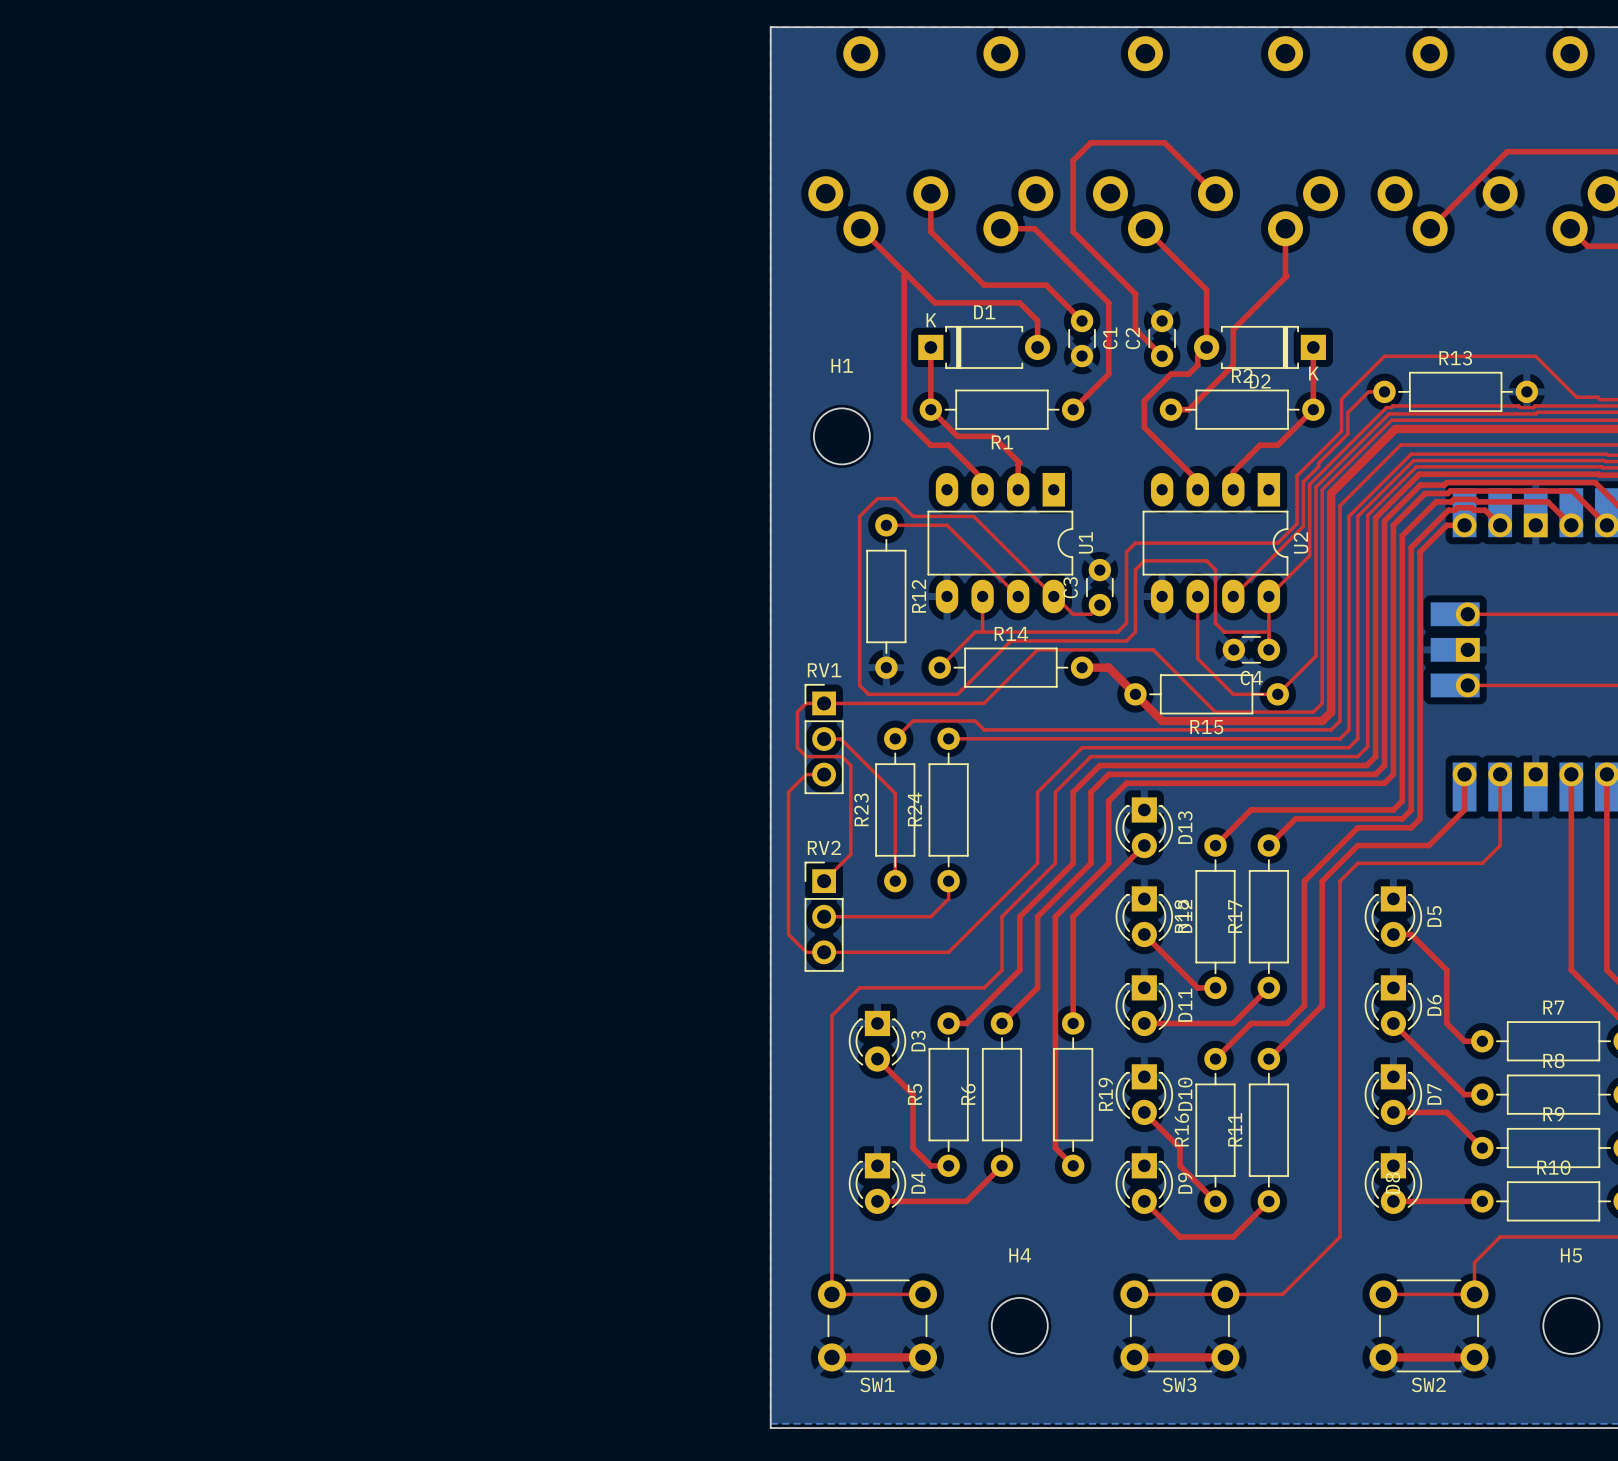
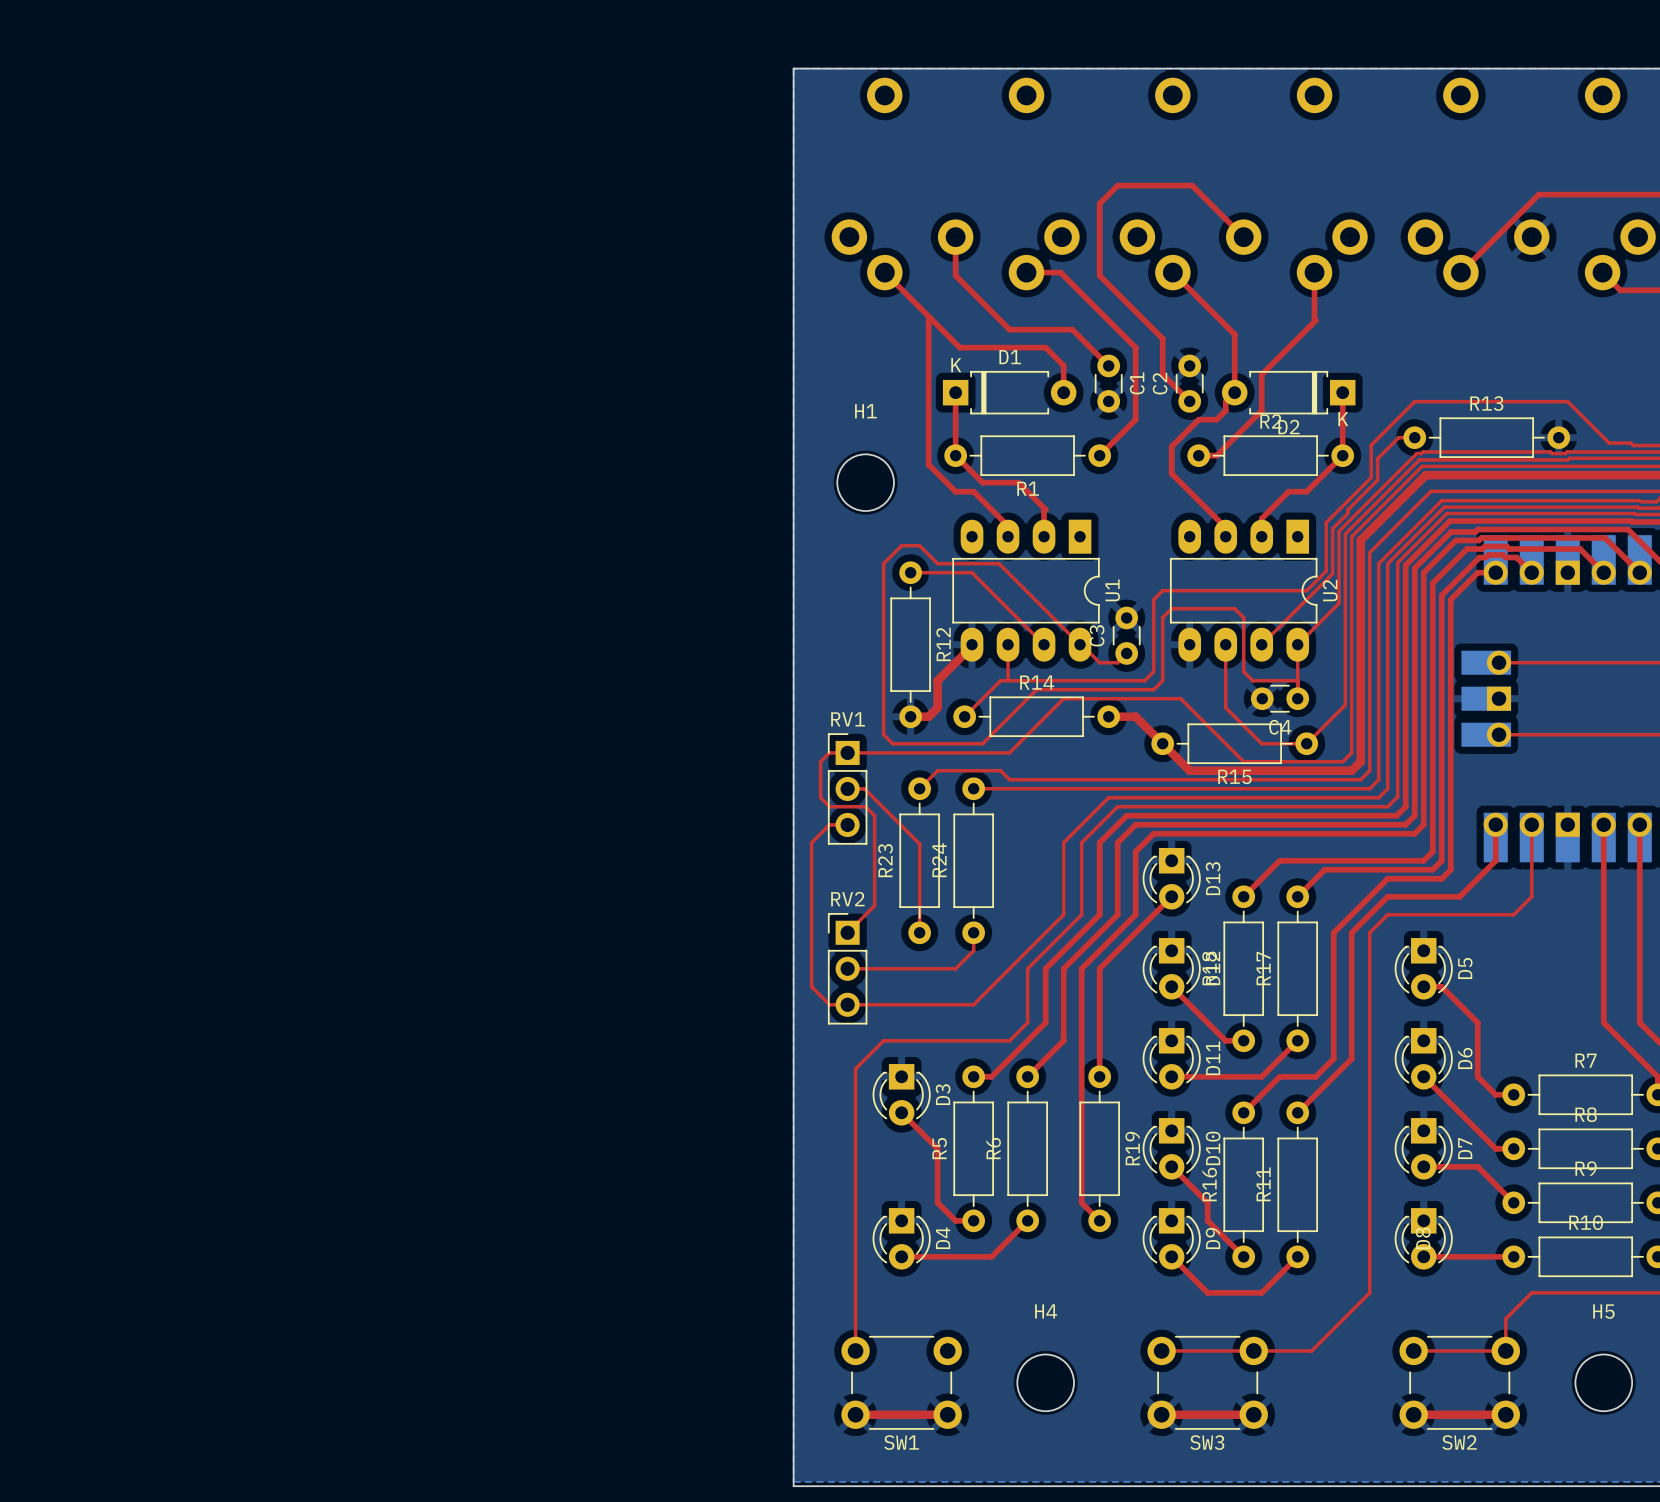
top track: none -> (972, 644) (937, 680) (937, 707) (928, 716) (910, 716)
top track: (831, 1294) (923, 1294) -> none

